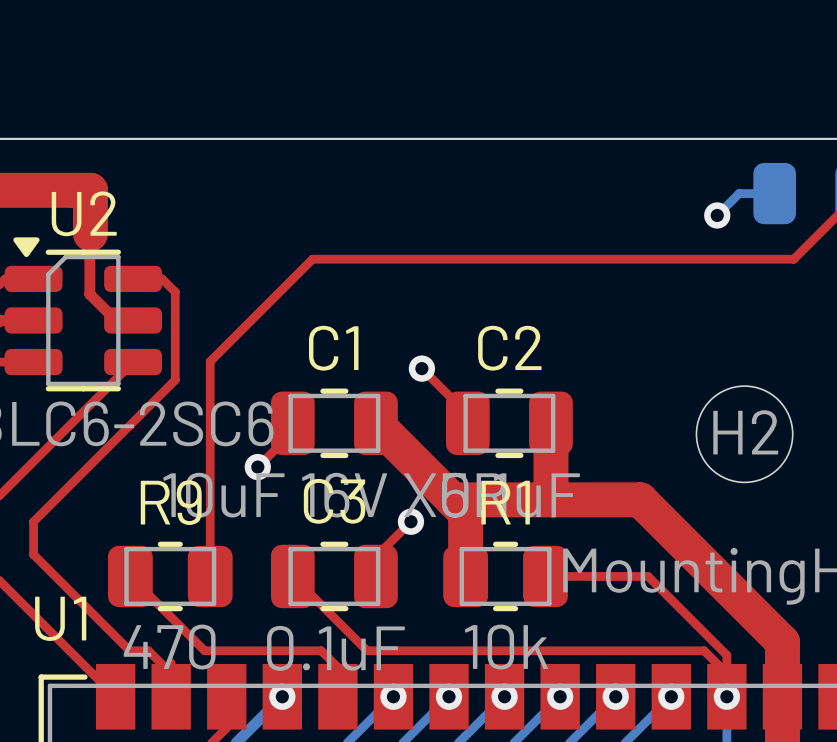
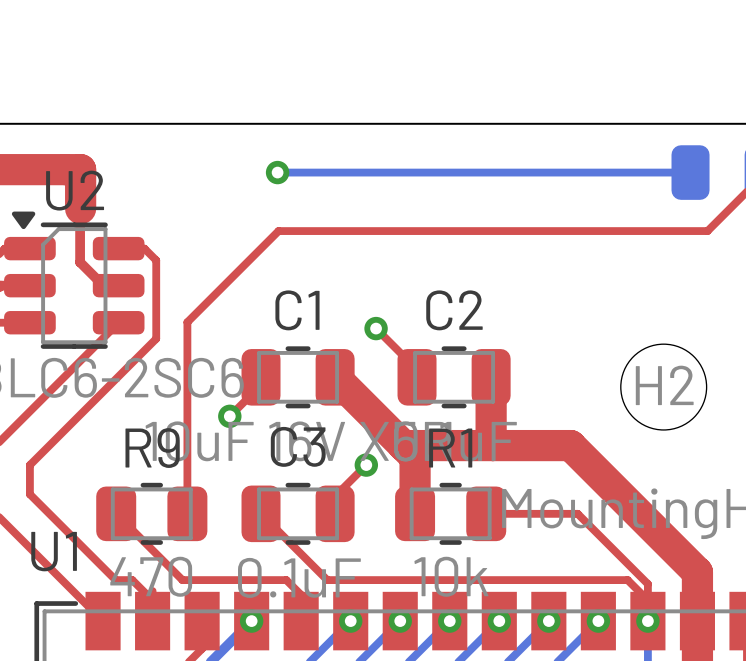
via: none -> (277, 172)
bottom track: (739, 193) (717, 215) -> (658, 172) (277, 172)
via: (717, 215) -> none

